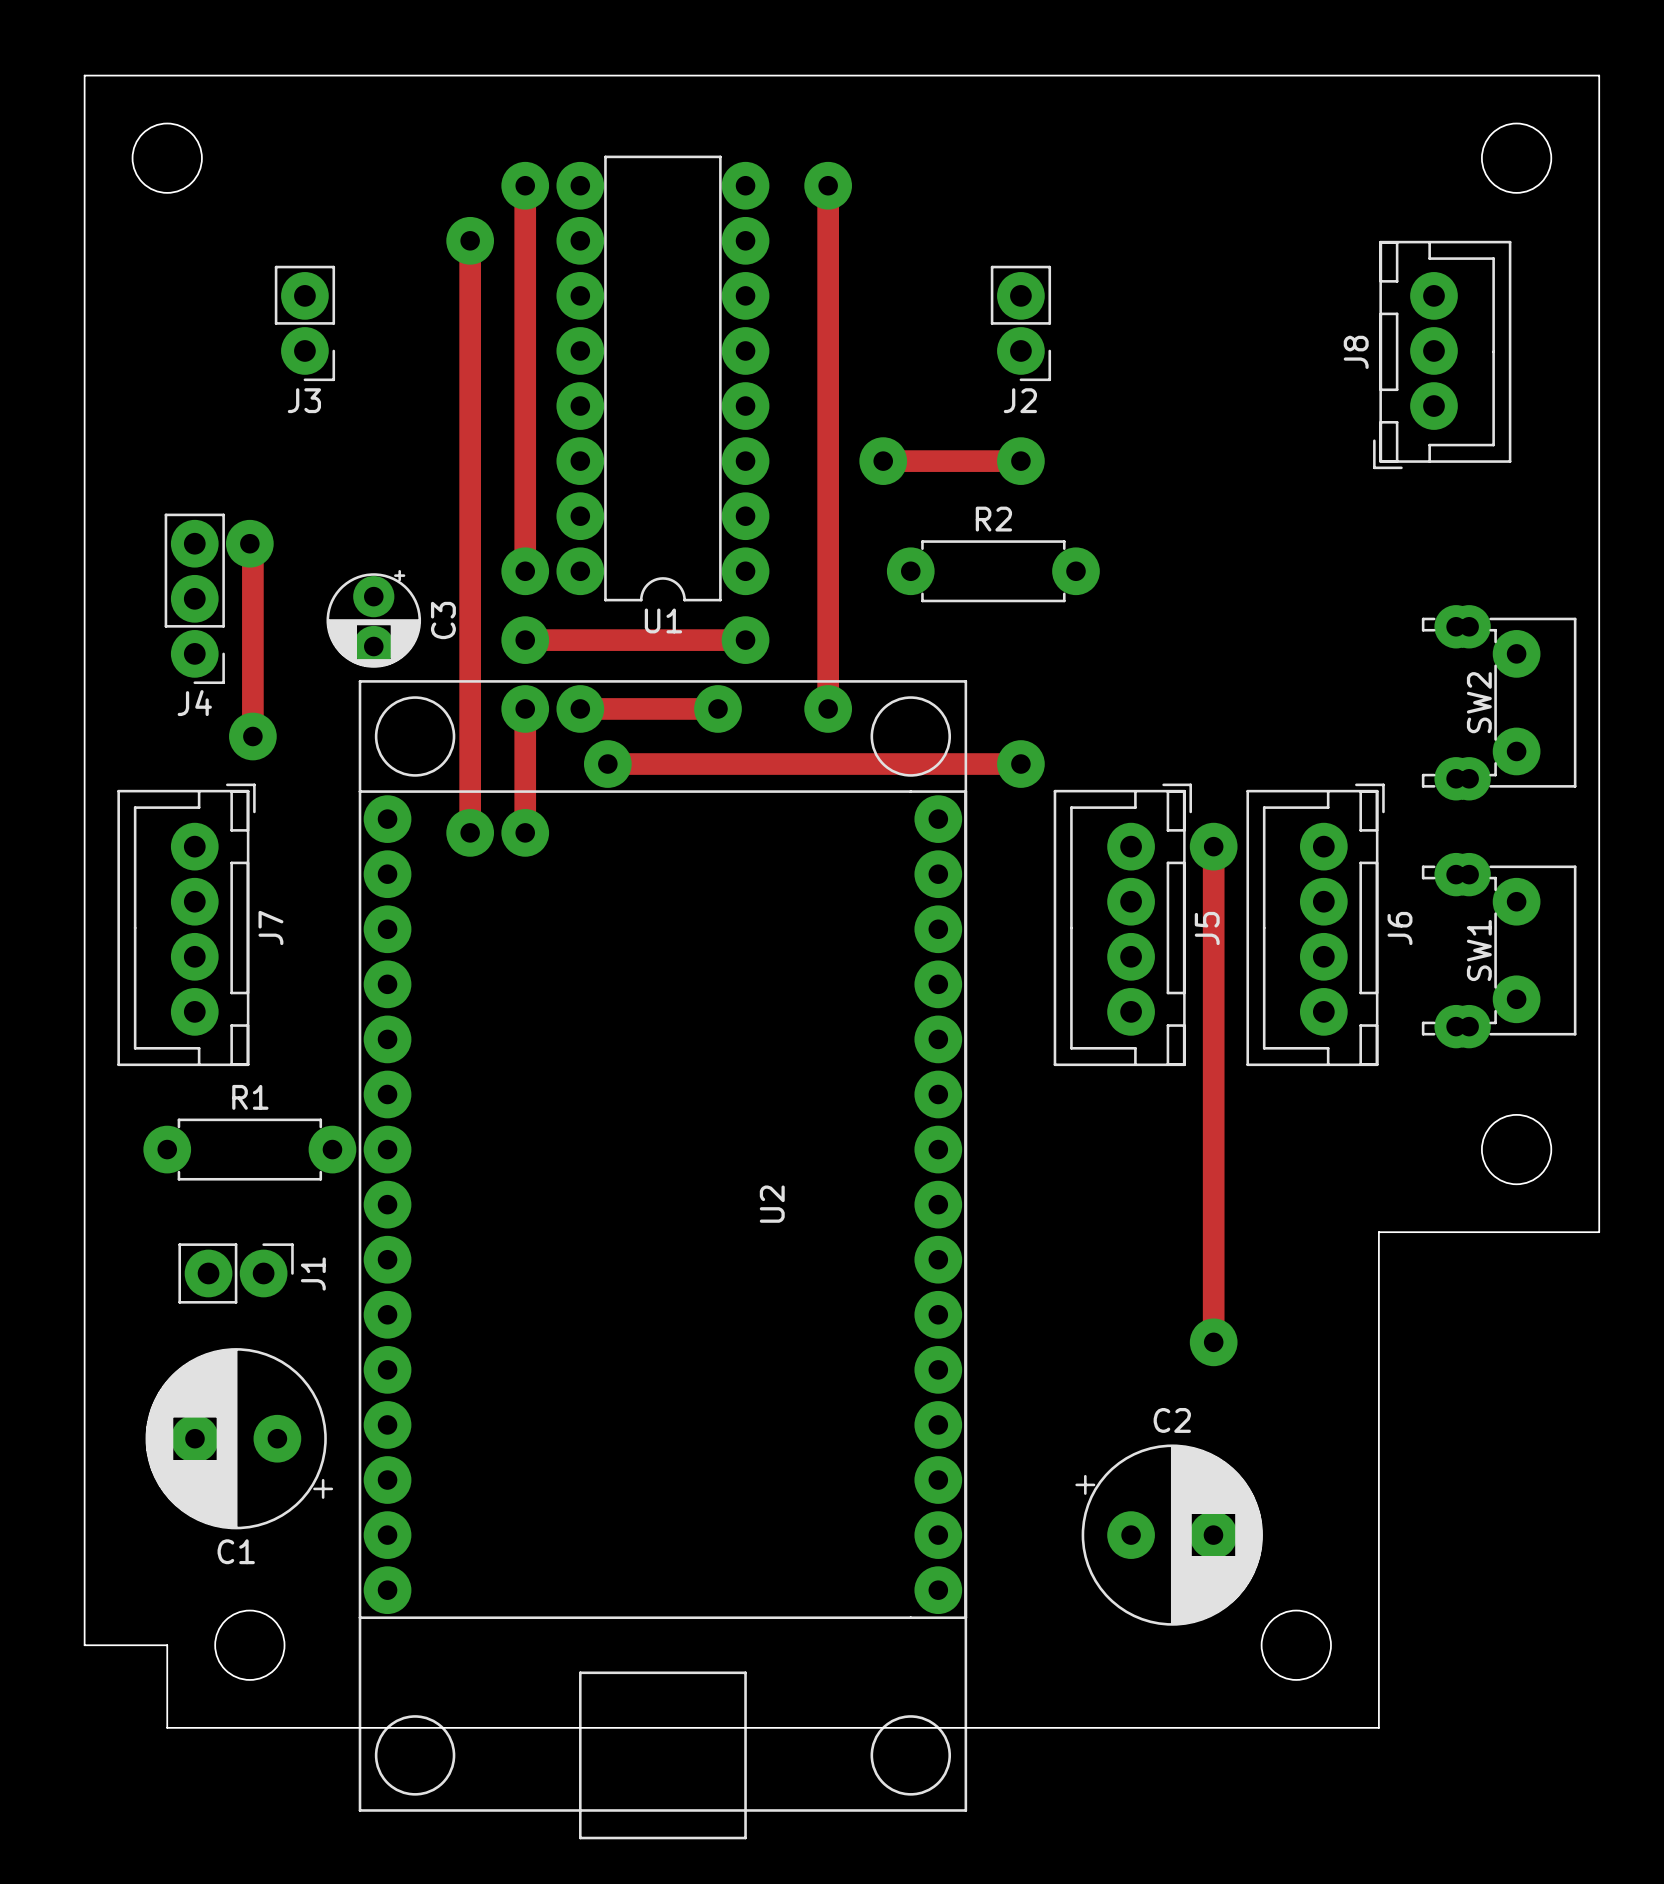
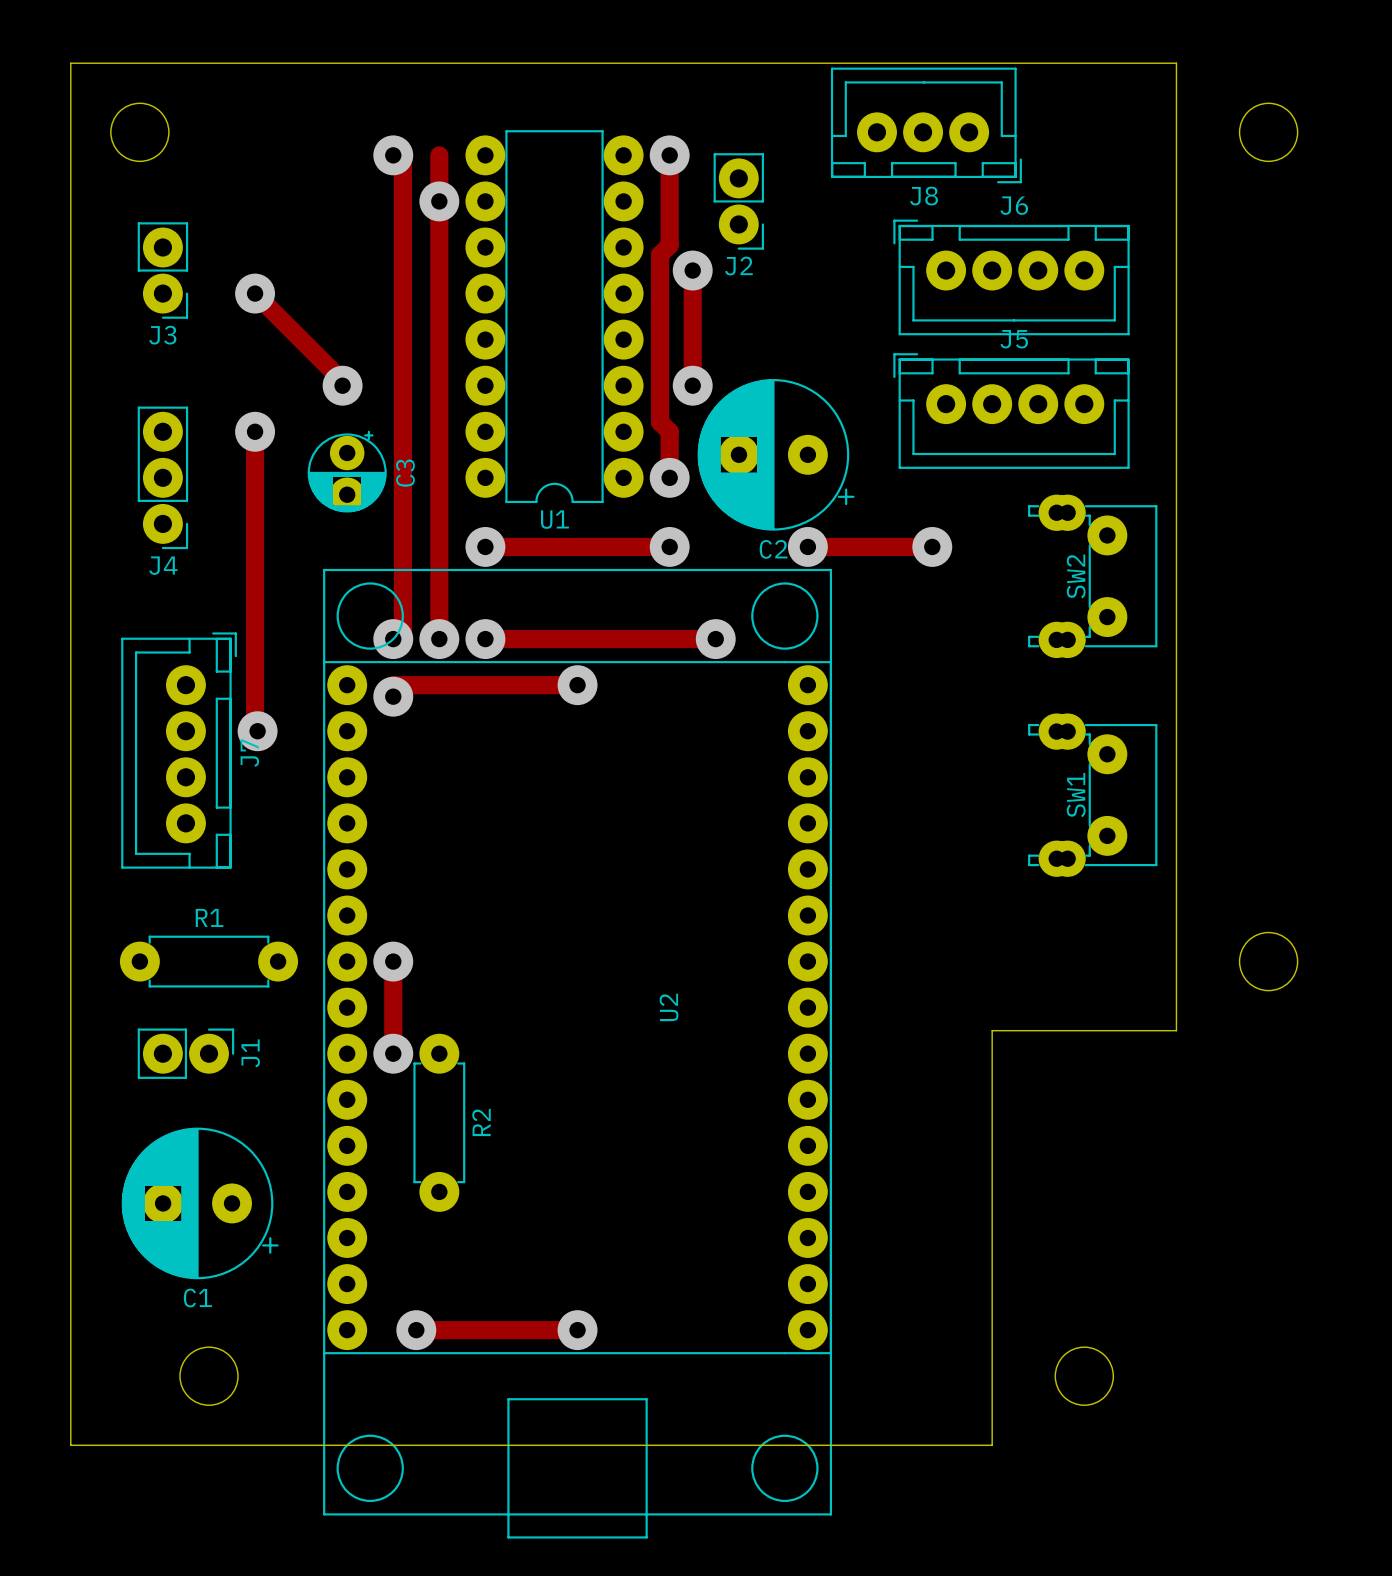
board edge: (1406, 75) (1599, 75) (1599, 1232) (1406, 1232) -> (1176, 63) (1176, 1030)
track: none -> (393, 155) (402, 164) (402, 629) (393, 639)
via: none -> (393, 155)
via: (525, 185) -> none
track: none -> (669, 155) (669, 245) (660, 254) (660, 422) (669, 431) (669, 477)
track: (828, 185) (828, 323) -> (439, 477) (439, 593)
via position: (828, 185) -> (669, 155)
track: (470, 240) (470, 832) -> none
via: (470, 240) -> none
via: none -> (439, 201)
J3 position: (304, 323) -> (162, 270)
via: none -> (692, 270)
J2 position: (1020, 323) -> (738, 201)
track: none -> (255, 293) (342, 381) (342, 385)
via: none -> (255, 293)
J8 rotation: 0° (1442, 354) -> 90° counterclockwise (926, 125)
J8 position: (1442, 354) -> (926, 125)
via: none -> (342, 385)
track: (828, 461) (828, 708) -> none
track: (883, 461) (1020, 461) -> none
via position: (883, 461) -> (692, 385)
via: (1020, 461) -> none
track: none -> (255, 431) (255, 728) (257, 731)
track: (249, 543) (252, 546) (252, 736) -> none
via position: (249, 543) -> (255, 431)
via: (525, 571) -> none
via: none -> (669, 477)
R2 rotation: 0° (993, 571) -> 90° clockwise (439, 1122)
R2 position: (993, 571) -> (439, 1122)
J4 position: (194, 598) -> (162, 477)
C3 position: (373, 618) -> (347, 471)
track: (525, 640) (745, 640) -> (485, 546) (669, 546)
via: (525, 640) -> none
via: (745, 640) -> none
via: none -> (485, 546)
via: none -> (669, 546)
track: none -> (807, 546) (932, 546)
via: none -> (807, 546)
via: none -> (932, 546)
SW2 position: (1499, 702) -> (1092, 576)
via: (525, 708) -> none
track: (580, 708) (718, 708) -> none
via: (580, 708) -> none
via: (718, 708) -> none
via: (828, 708) -> none
via: (252, 736) -> none
via: none -> (393, 639)
track: (525, 764) (525, 832) -> none
via: none -> (439, 639)
via: none -> (485, 639)
via: (607, 764) -> none
track: (855, 764) (1020, 764) -> none
via: none -> (715, 639)
via: (1020, 764) -> none
track: none -> (393, 685) (577, 685)
via: none -> (577, 685)
via: (525, 832) -> none
track: (1213, 846) (1213, 1342) -> none
via: (1213, 846) -> none
via: none -> (257, 731)
J7 position: (186, 924) -> (179, 750)
J5 rotation: 0° (1122, 924) -> 90° counterclockwise (1011, 411)
J5 position: (1122, 924) -> (1011, 411)
J6 rotation: 0° (1315, 924) -> 90° counterclockwise (1011, 277)
J6 position: (1315, 924) -> (1011, 277)
SW1 position: (1499, 950) -> (1092, 795)
track: none -> (393, 961) (393, 1053)
via: none -> (393, 961)
board edge: (1378, 1232) (1378, 1727) (1186, 1727) -> (1153, 1030) (992, 1030) (992, 1445)
via: none -> (393, 1053)
U2 position: (662, 1259) -> (577, 1053)
J1 position: (236, 1273) -> (185, 1053)
via: (1213, 1342) -> none
C2 rotation: 0° (1169, 1535) -> 180° (776, 454)
C2 position: (1169, 1535) -> (776, 454)
track: none -> (416, 1330) (577, 1330)
via: none -> (416, 1330)
via: none -> (577, 1330)
board edge: (84, 1645) (167, 1645) (167, 1727) -> (70, 1376) (70, 1445) (139, 1445)

